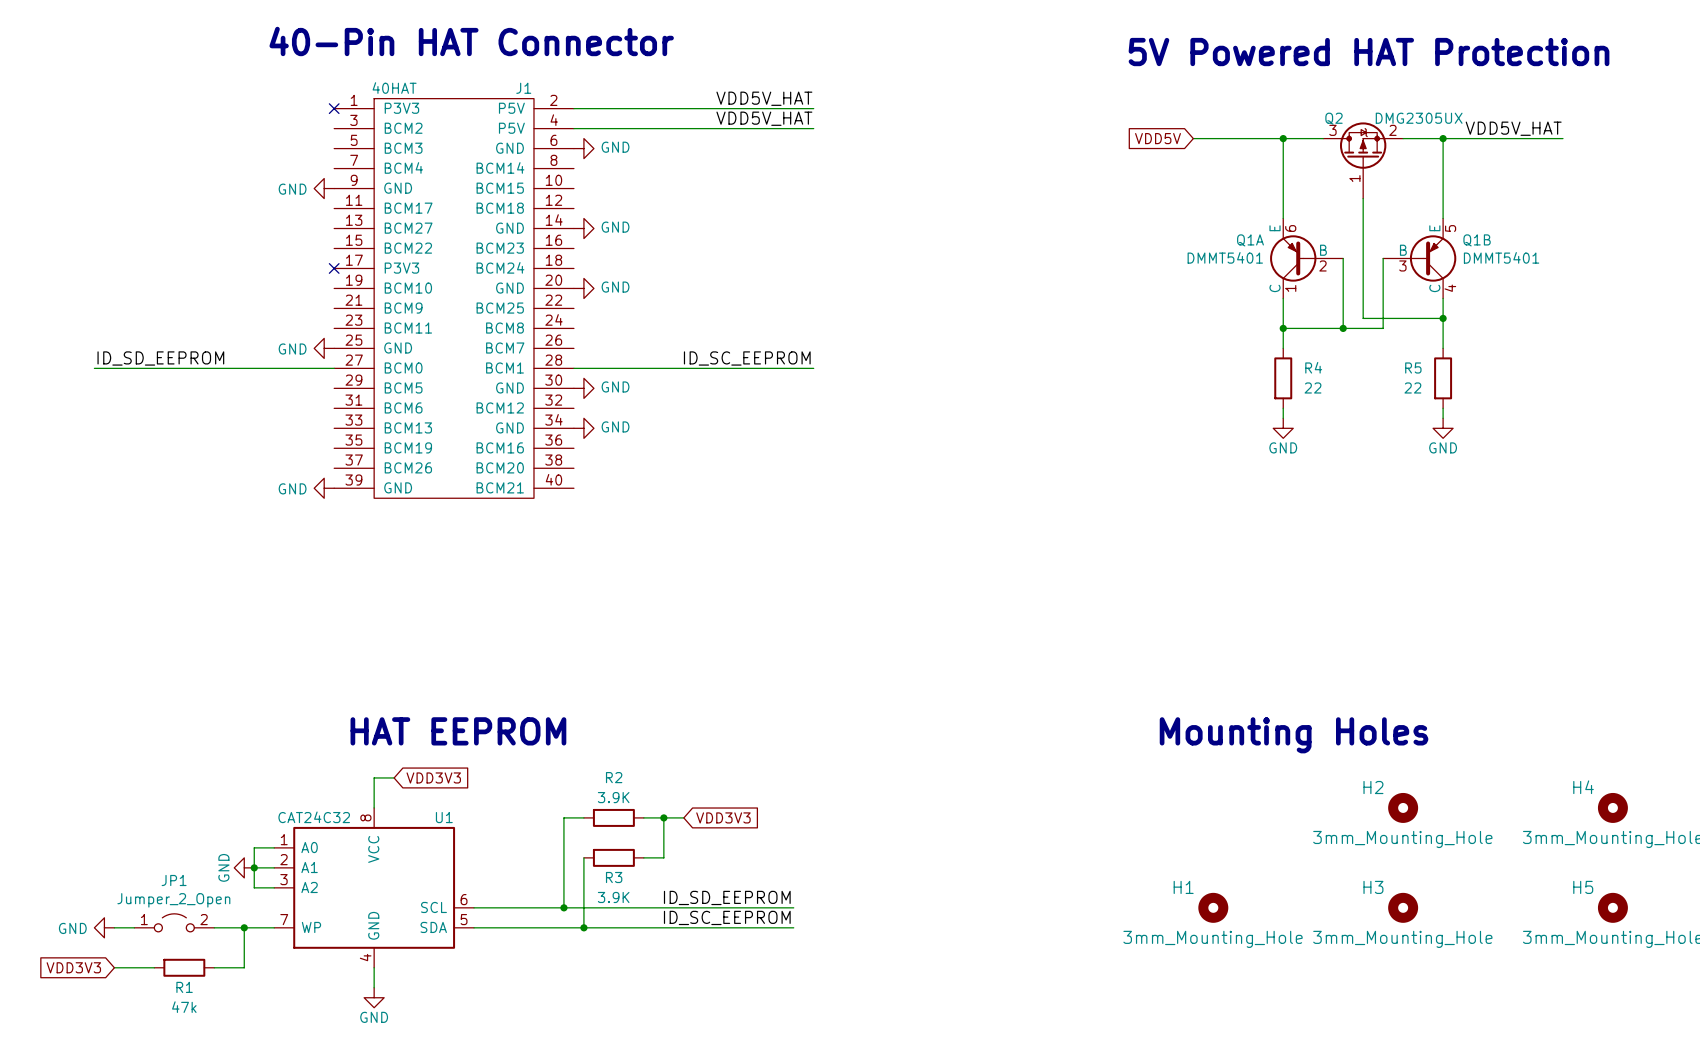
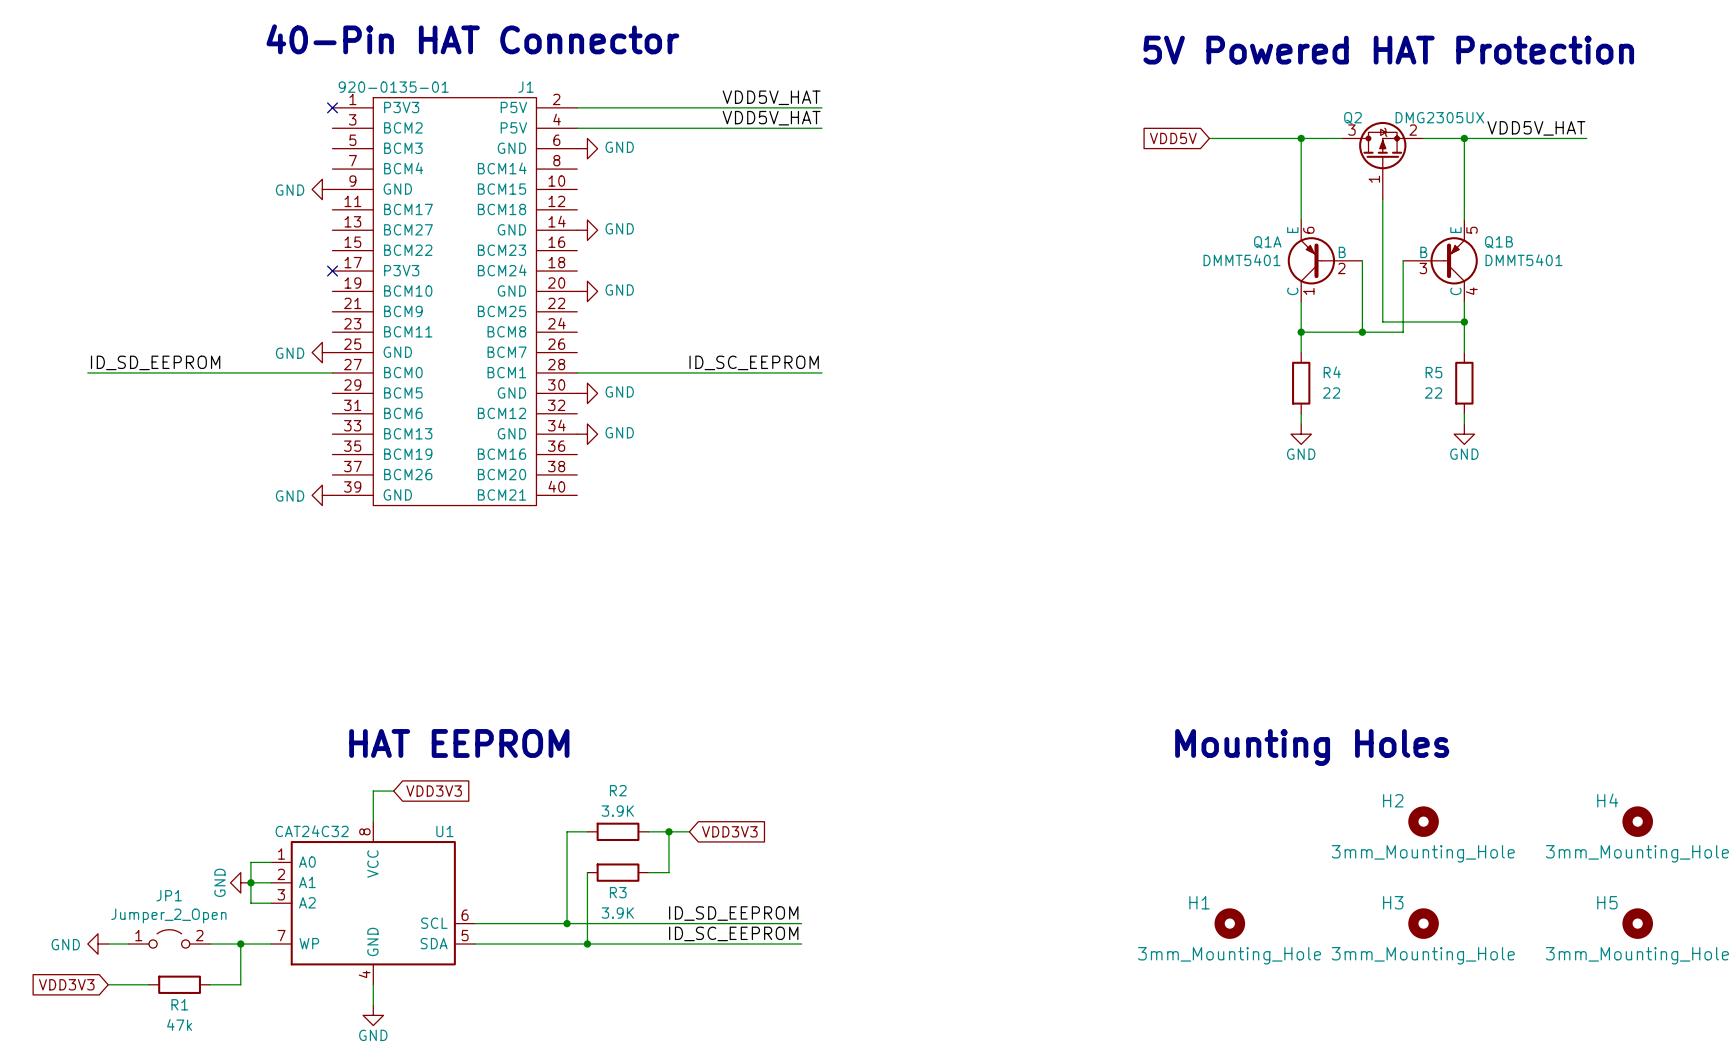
J1 value: 40HAT (394, 88) -> 920-0135-01 (393, 87)

